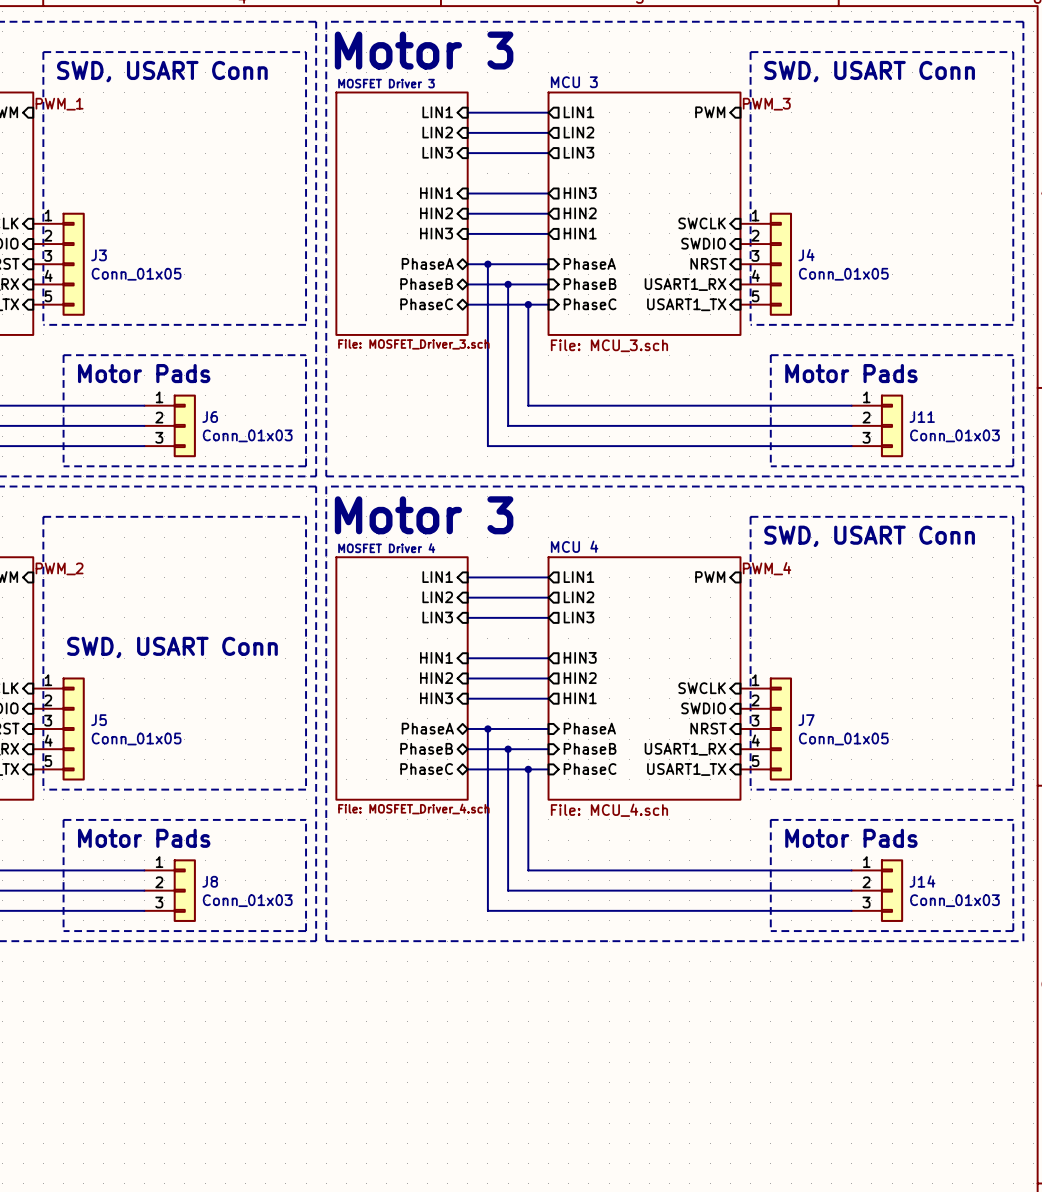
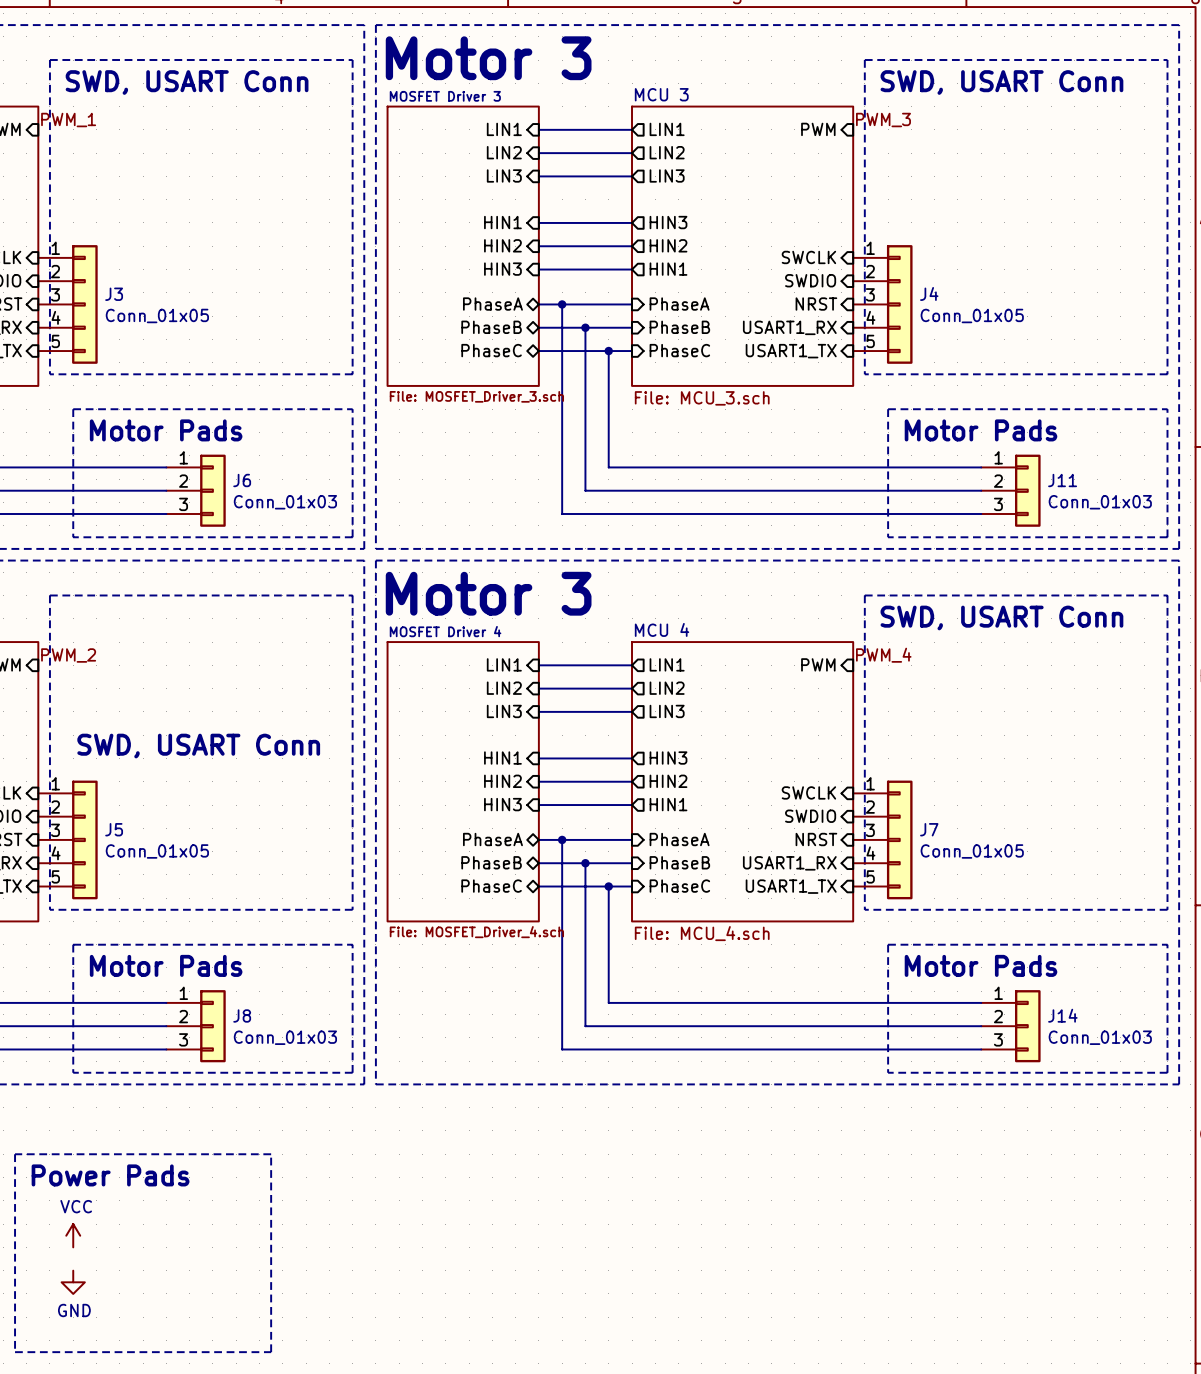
line: none -> (15, 1154) (271, 1154) (271, 1352) (15, 1352) (15, 1154)
text: none -> Power Pads (110, 1175)
power symbol: none -> VCC (73, 1235)
power symbol: none -> GND (73, 1282)

